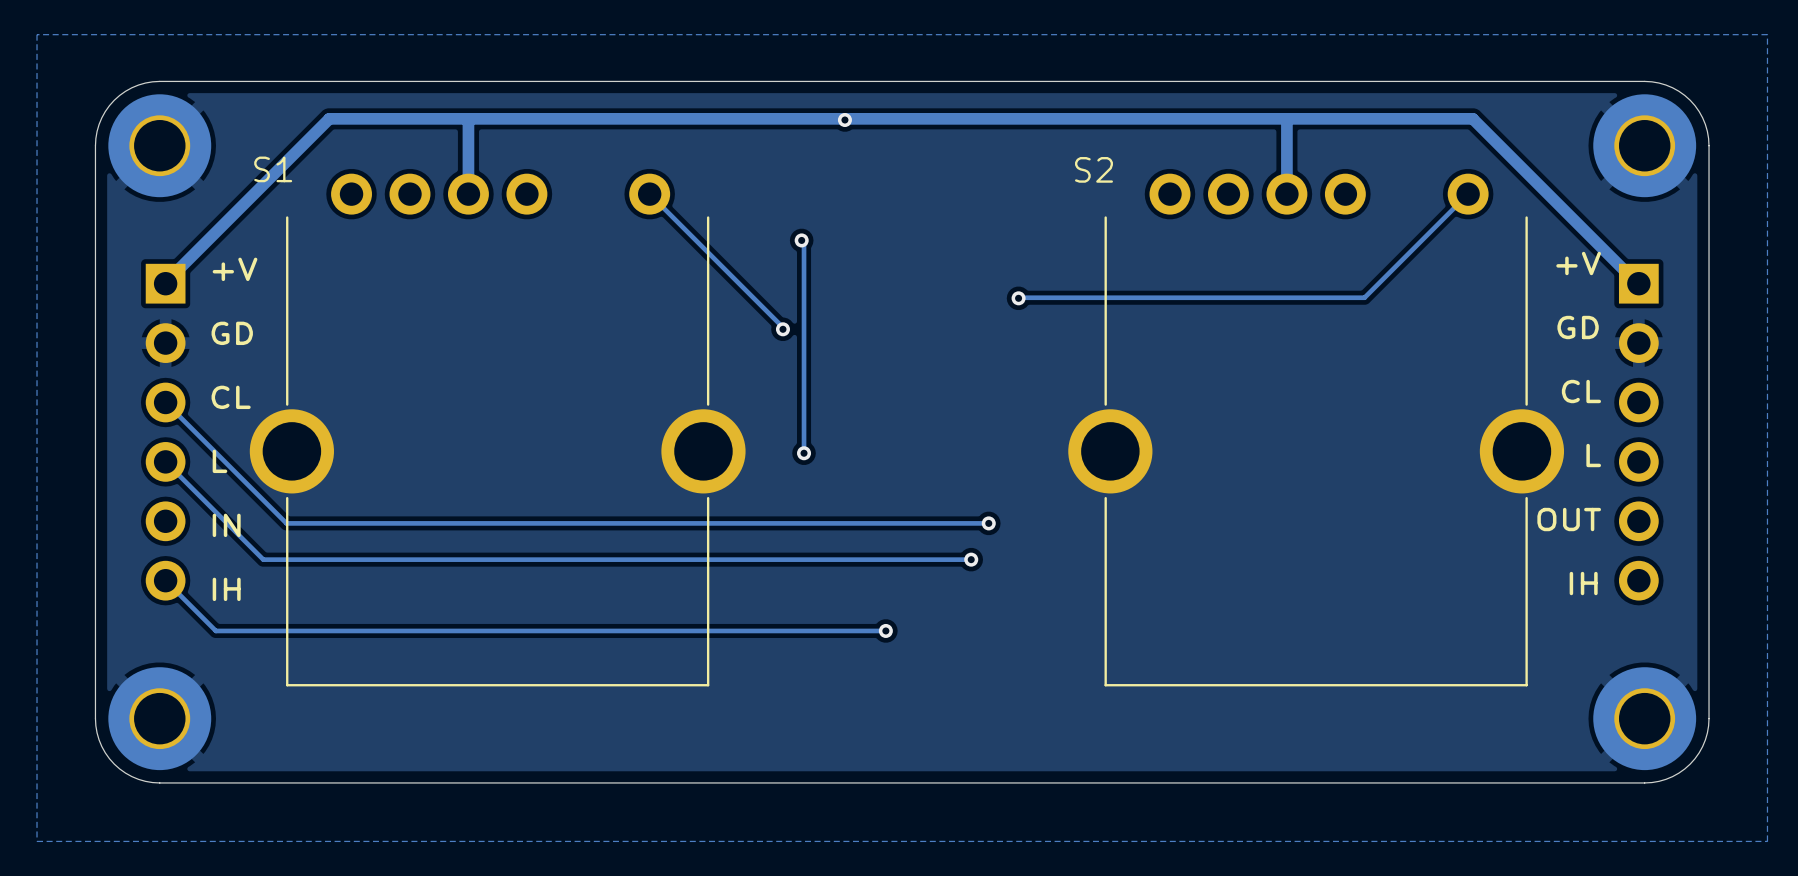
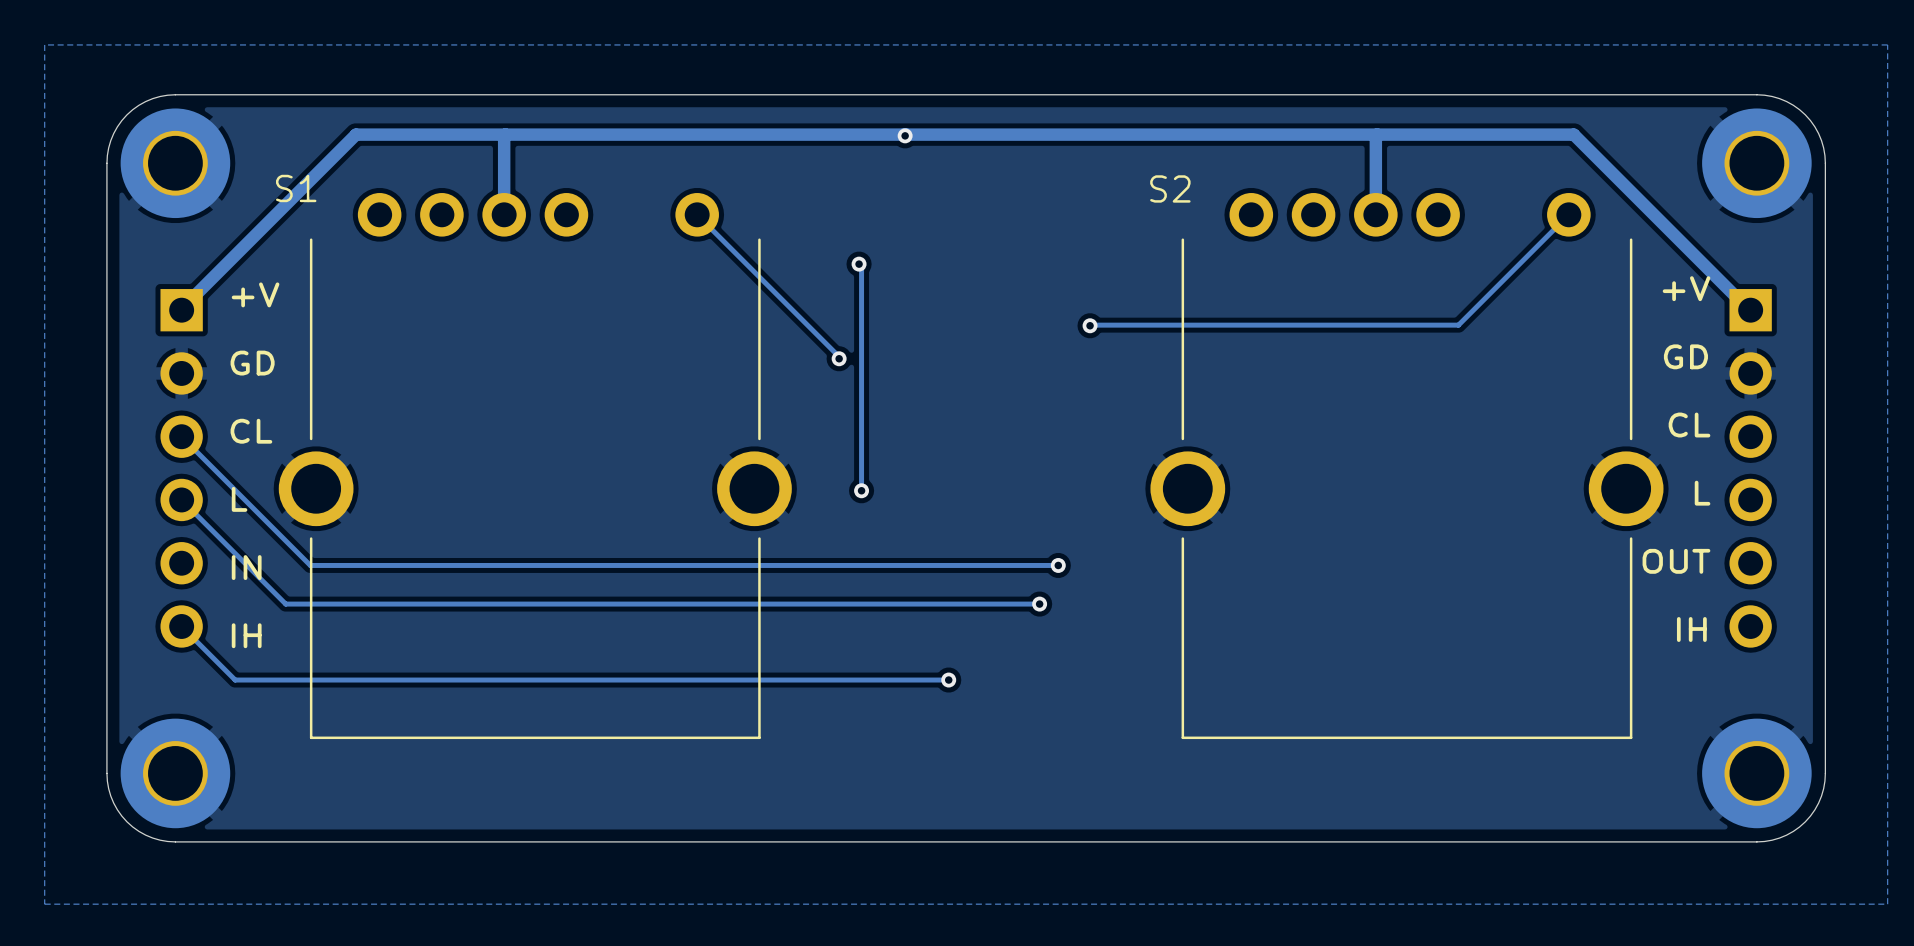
S1 footprint: [249, 173, 746, 687] -> [278, 193, 792, 740]
S2 footprint: [1068, 173, 1565, 687] -> [1150, 193, 1664, 740]

